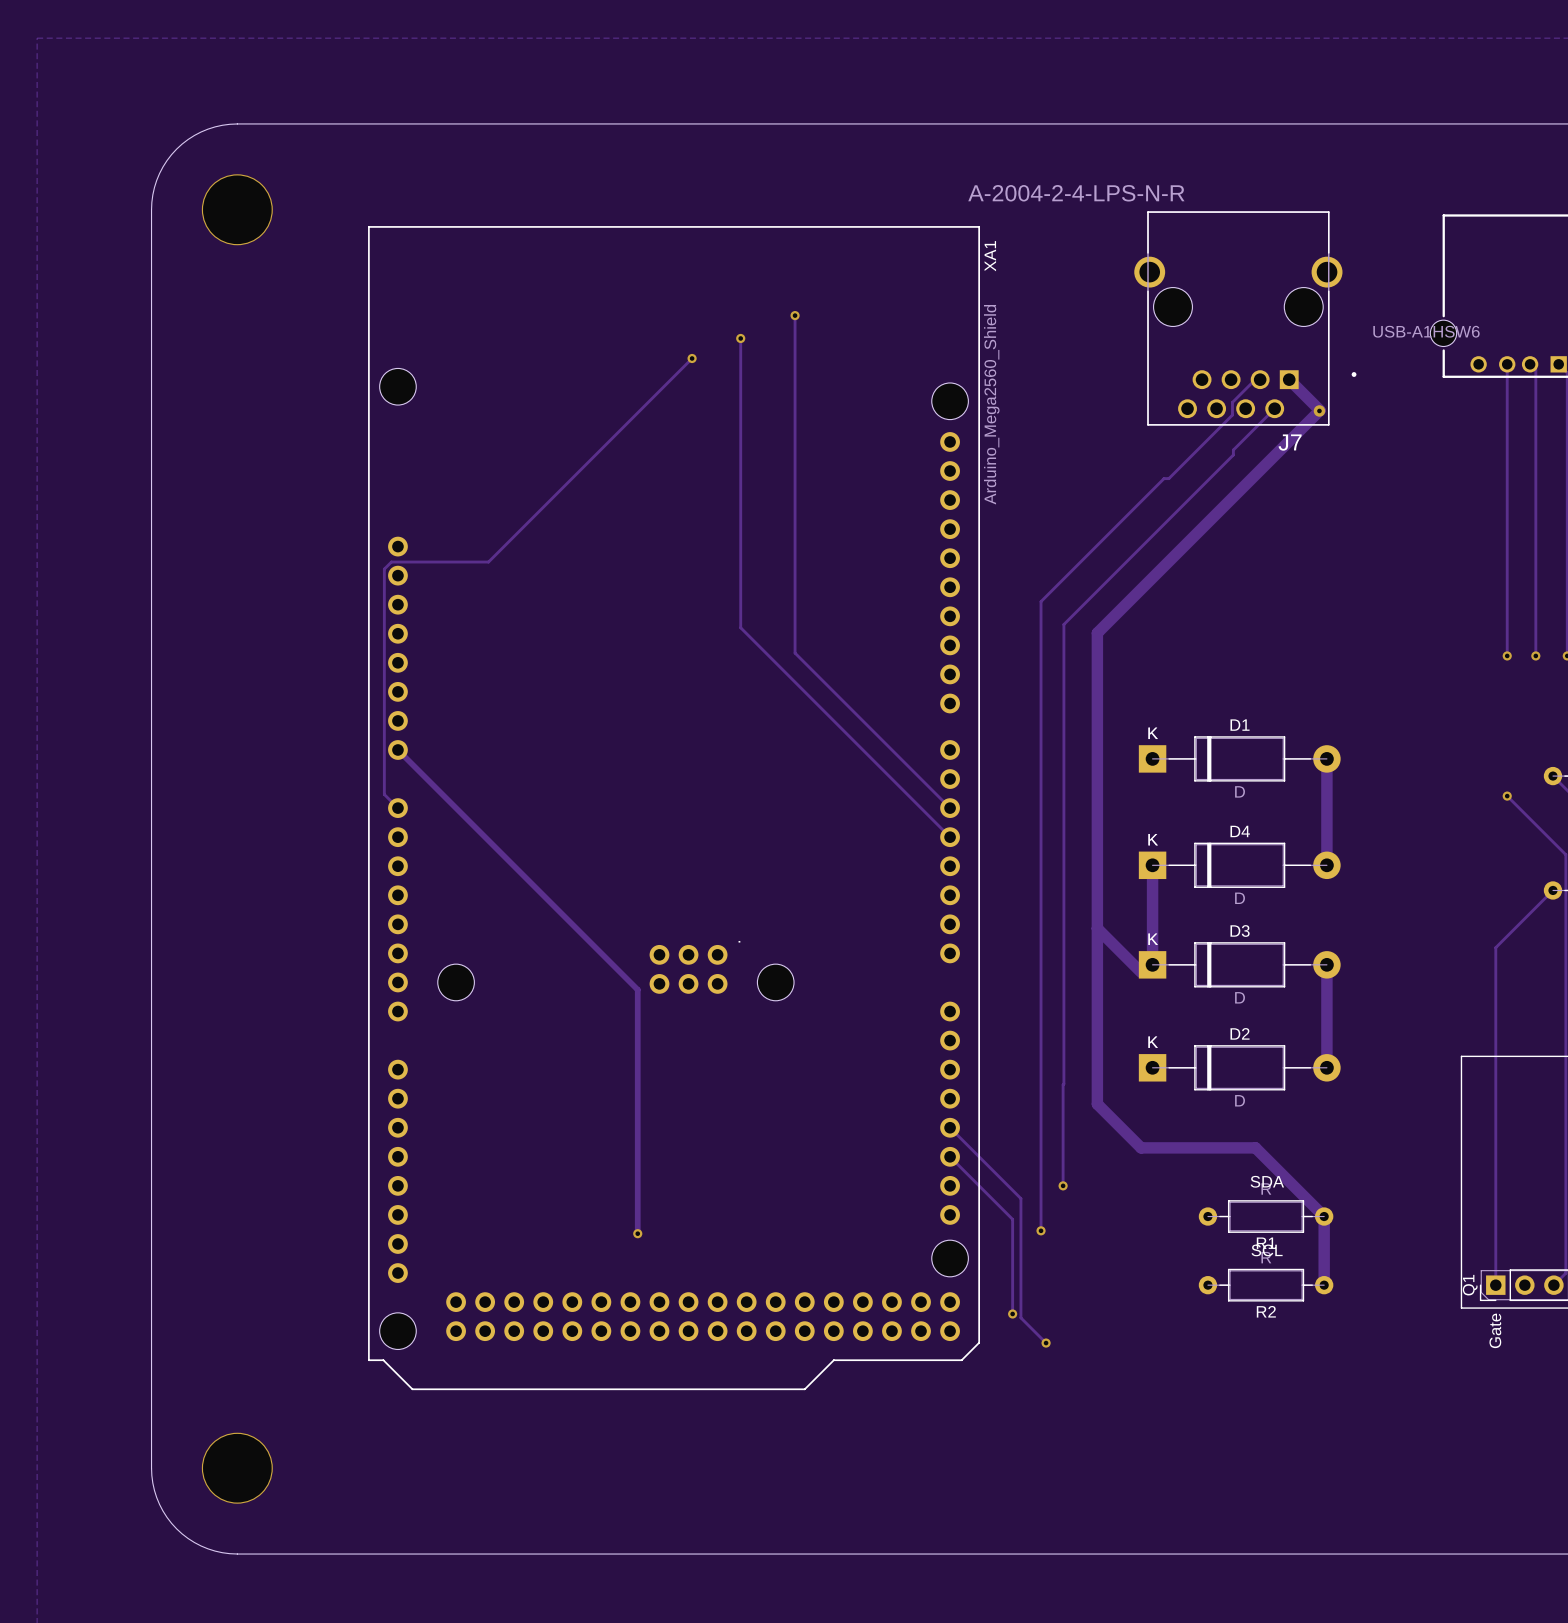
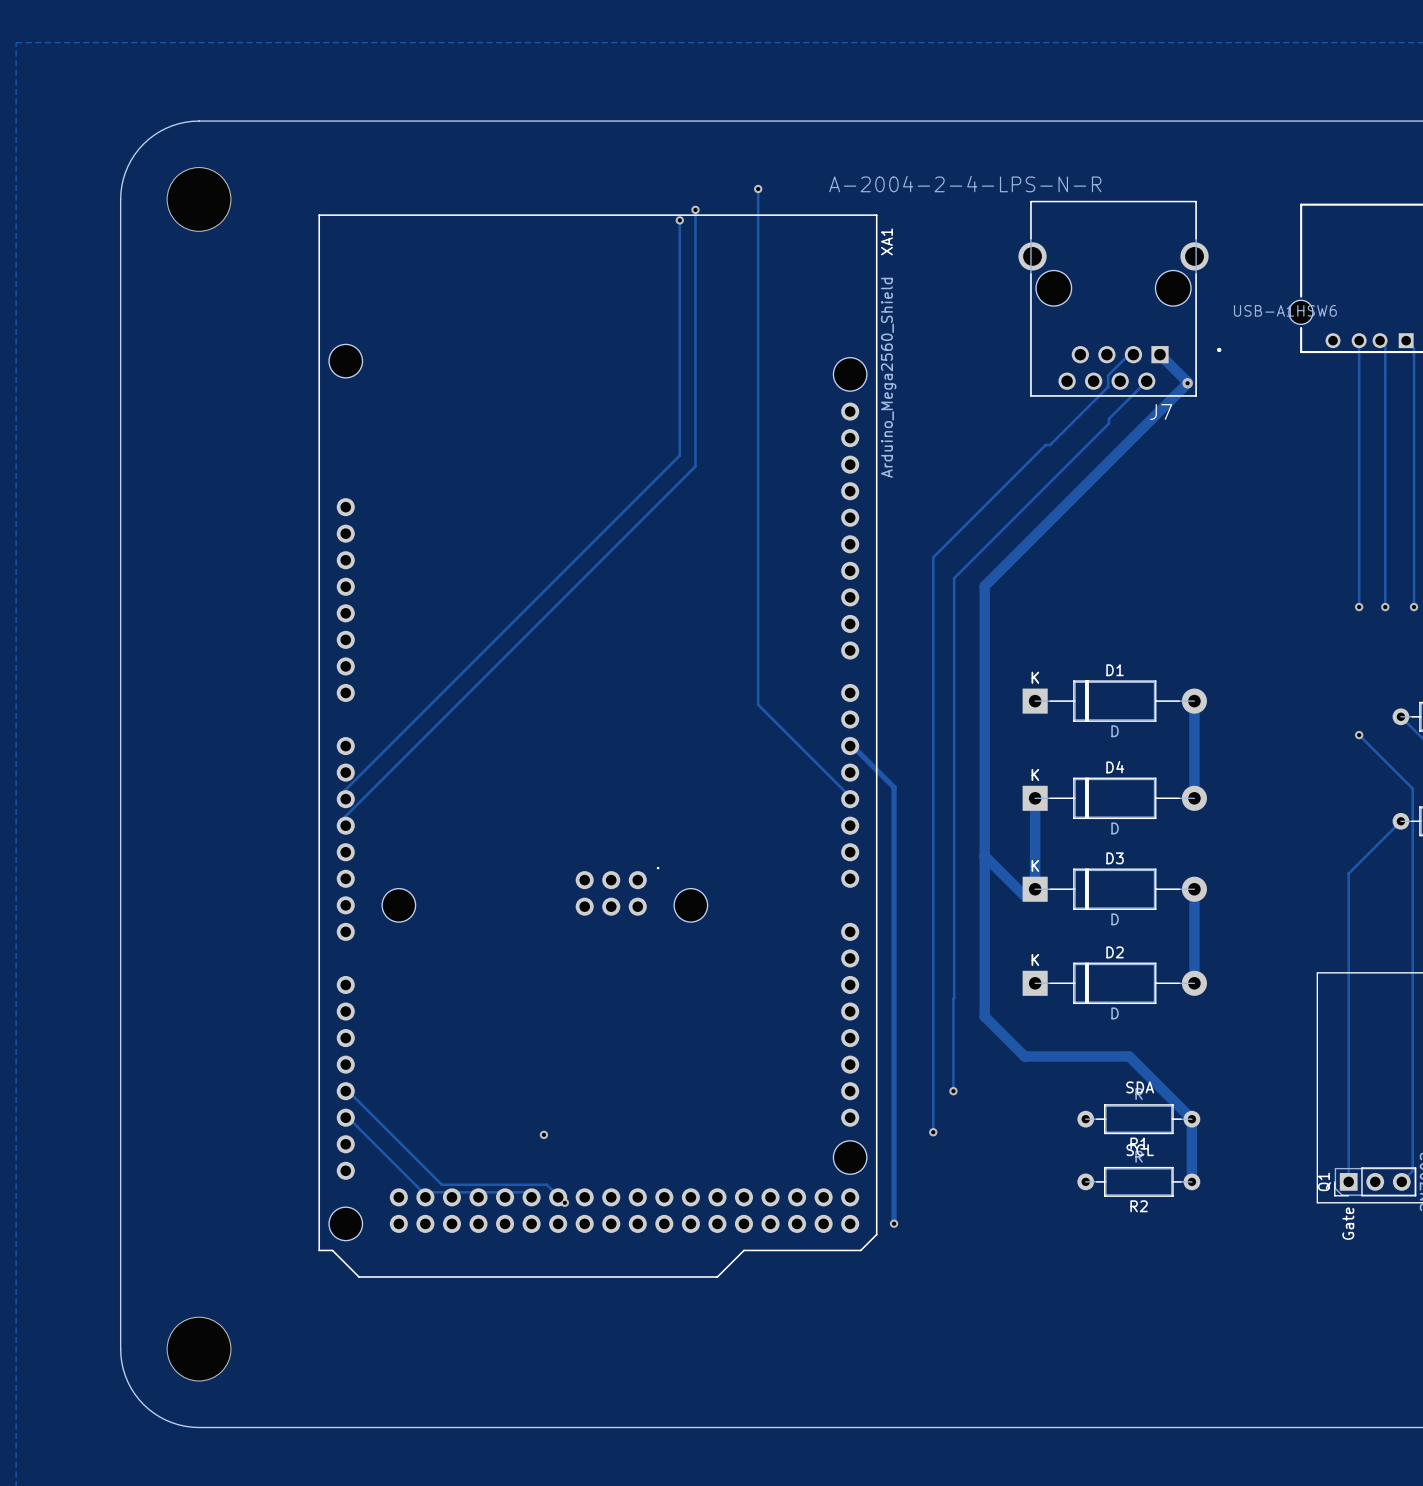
track: none -> (758, 189) (758, 704) (846, 793)
via: none -> (758, 189)
track: none -> (695, 209) (695, 466) (342, 819)
via: none -> (695, 209)
track: none -> (679, 220) (679, 455) (342, 793)
via: none -> (679, 220)
track: (795, 315) (795, 653) (950, 808) -> none
via: (795, 315) -> none
track: (740, 338) (740, 627) (950, 837) -> none
via: (740, 338) -> none
track: (692, 358) (488, 562) (391, 562) (384, 569) (384, 794) (397, 808) -> none
via: (692, 358) -> none
track: (397, 749) (637, 989) (637, 1233) -> none
track: none -> (846, 740) (894, 787) (894, 1223)
track: (950, 1127) (1020, 1198) (1020, 1317) (1046, 1343) -> none
track: (950, 1156) (1012, 1219) (1012, 1313) -> none
track: none -> (342, 1085) (441, 1184) (546, 1184) (564, 1202)
track: none -> (342, 1111) (422, 1192) (533, 1192)
via position: (637, 1233) -> (543, 1134)
via: none -> (564, 1202)
via position: (1012, 1313) -> (894, 1223)
via: (1046, 1343) -> none

